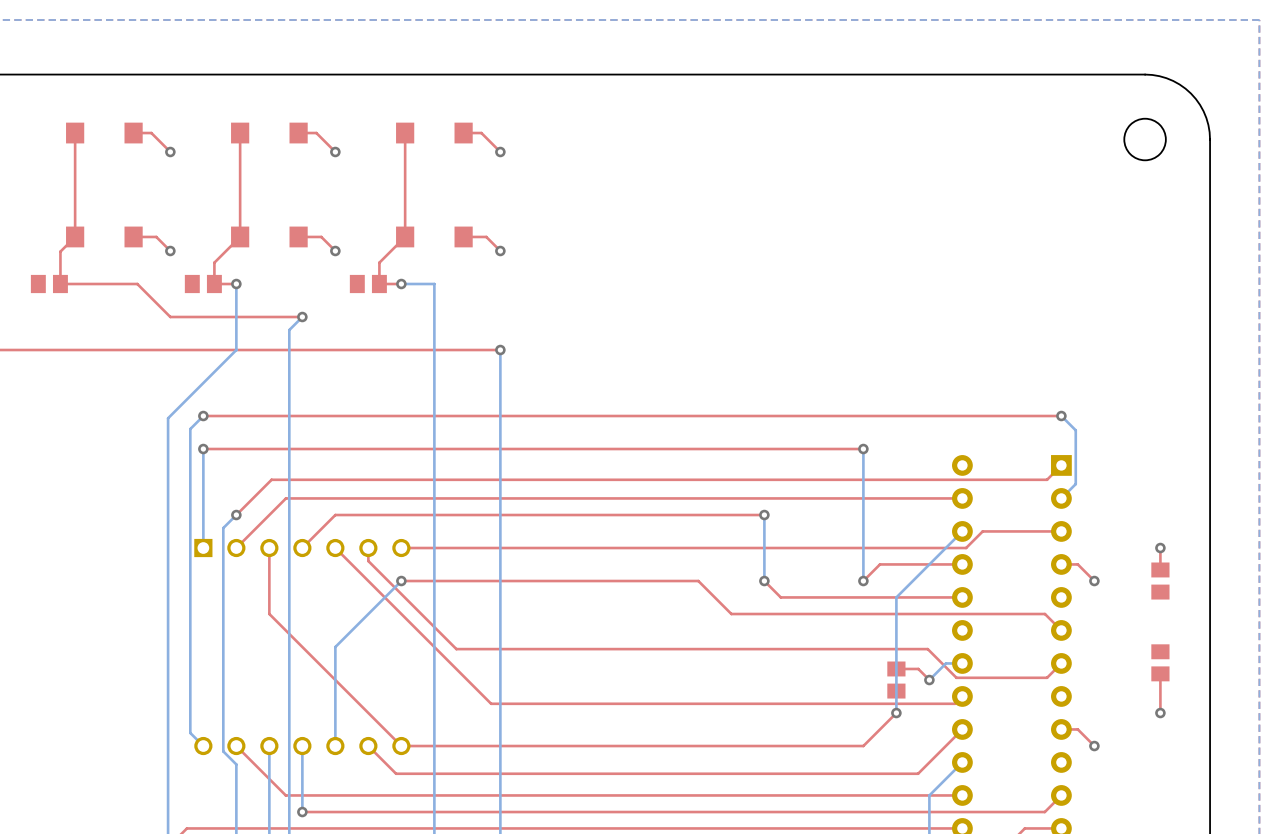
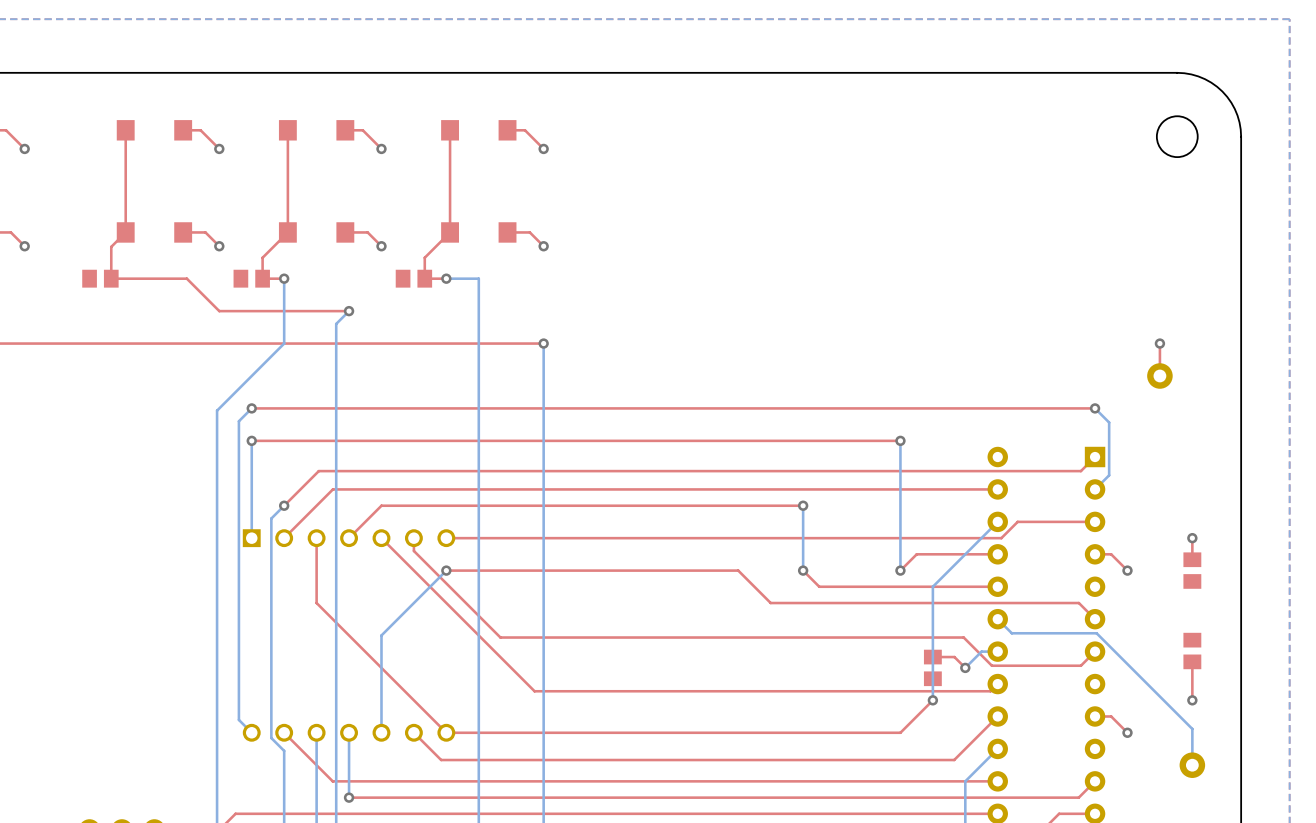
top track: none -> (1159, 343) (1159, 375)
via: none -> (1159, 343)
part: none -> (1159, 375)
bottom track: none -> (997, 619) (1011, 633) (1096, 633) (1192, 728) (1192, 765)
part: none -> (1192, 765)

